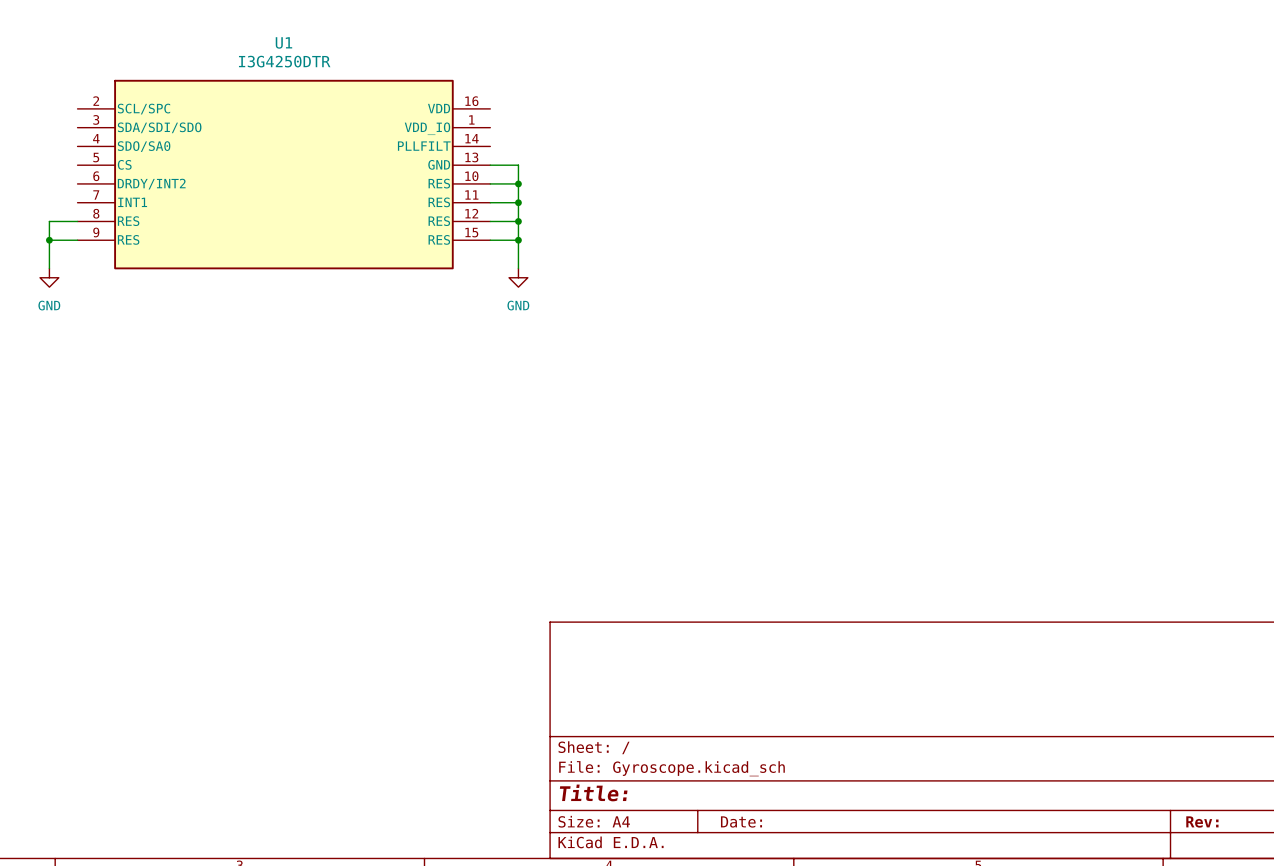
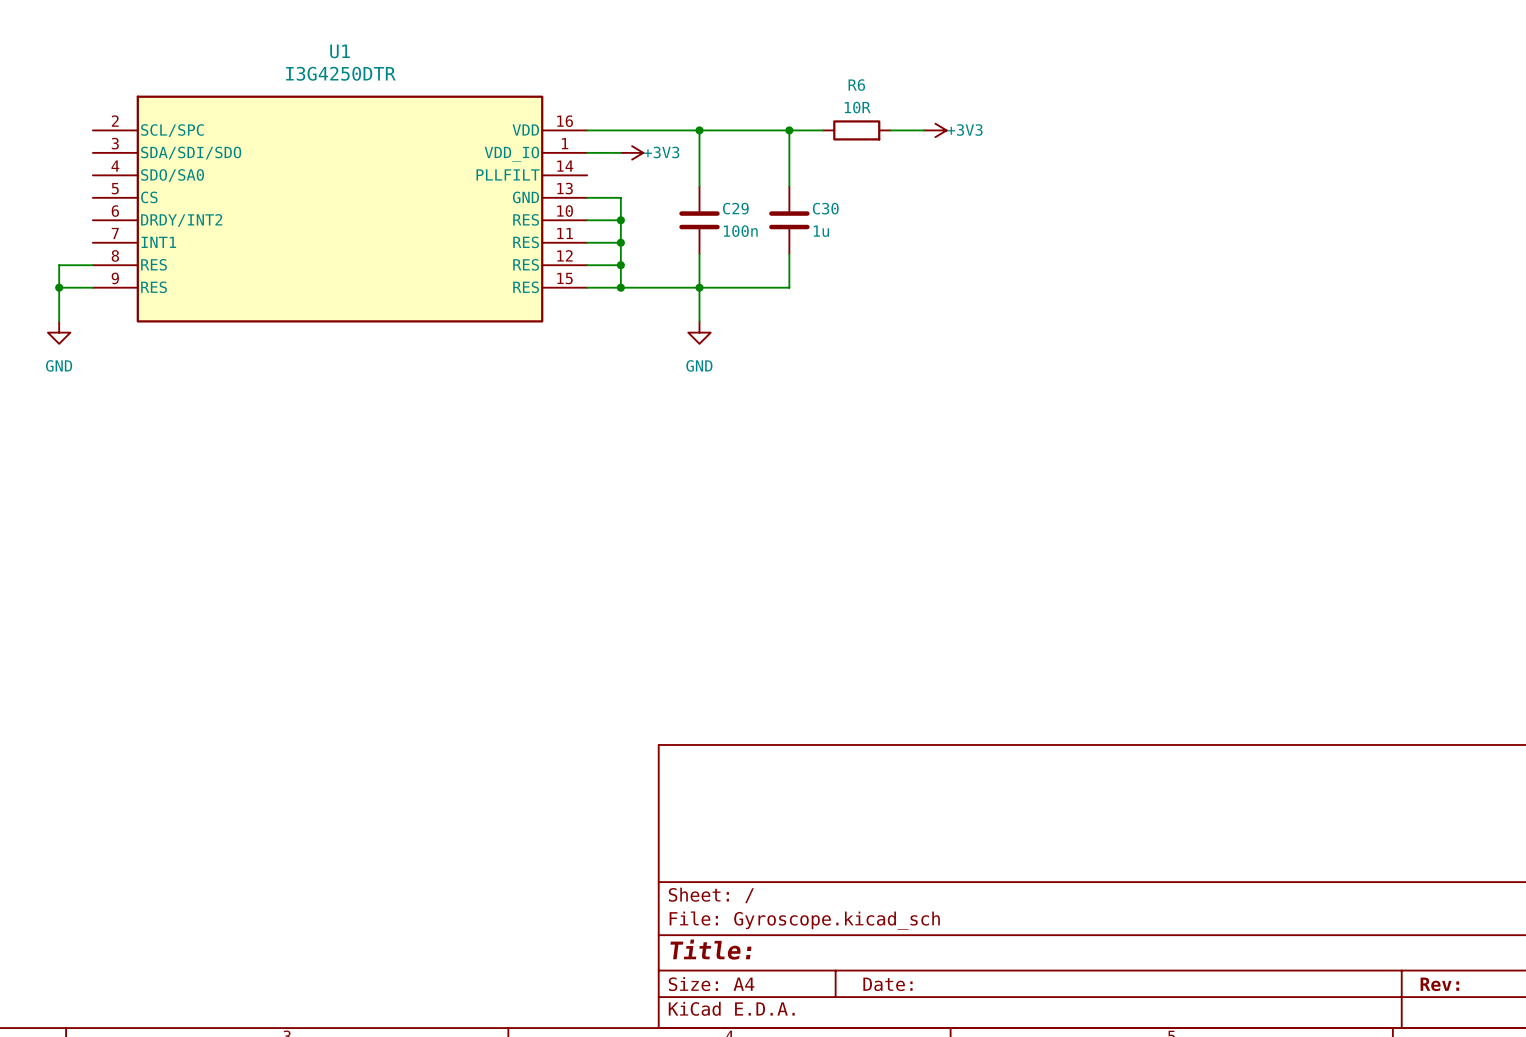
wire: none -> (587, 130) (823, 130)
wire: none -> (699, 130) (699, 186)
junction: none -> (699, 130)
wire: none -> (789, 130) (789, 186)
junction: none -> (789, 130)
R6: none -> 10R (856, 130)
wire: none -> (890, 130) (924, 130)
power symbol: none -> +3V3 (935, 130)
wire: none -> (587, 152) (620, 152)
power symbol: none -> +3V3 (632, 152)
C29: none -> 100n (699, 220)
C30: none -> 1u (789, 220)
wire: none -> (699, 253) (699, 321)
wire: (518, 240) (518, 268) -> (620, 287) (789, 287) (789, 253)
junction: none -> (699, 287)
power symbol position: GND (518, 277) -> GND (699, 332)

